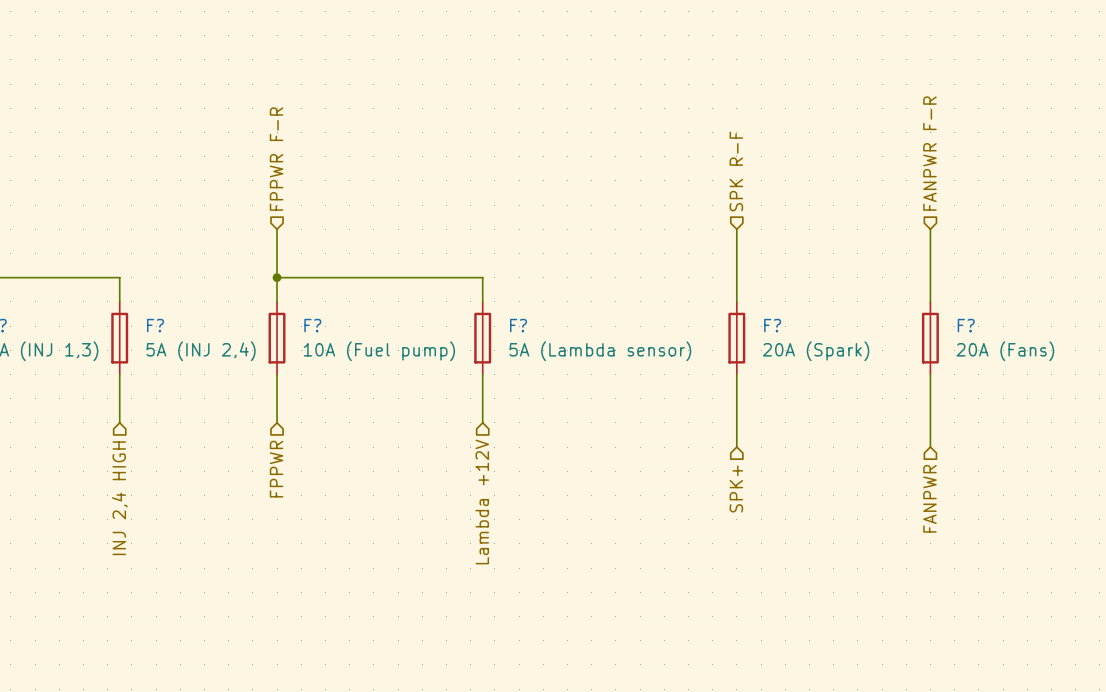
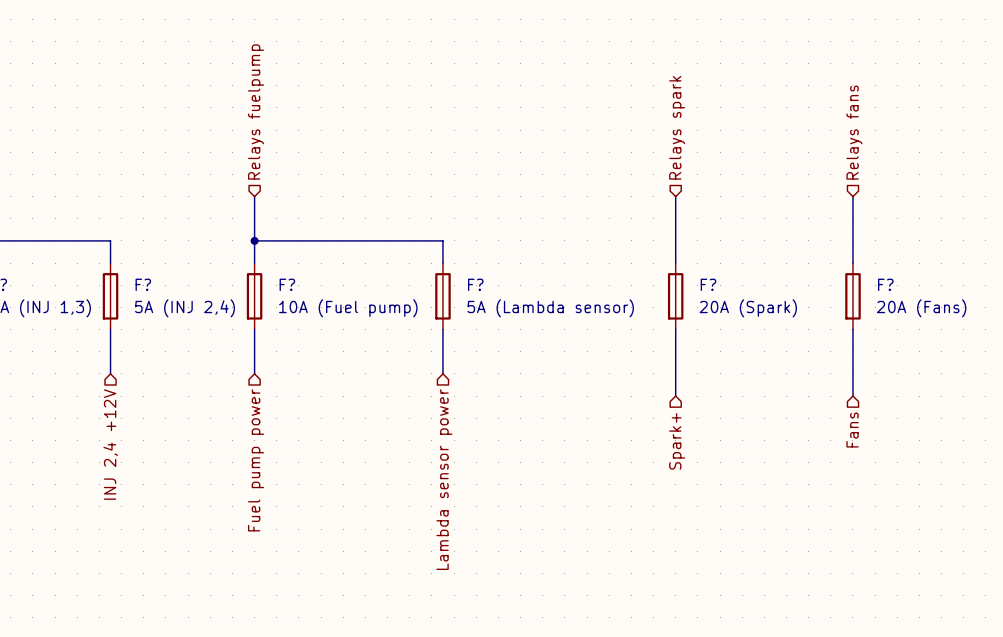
hierarchical label: FANPWR F-R (929, 153) -> Relays fans (854, 132)
hierarchical label: FPPWR F-R (276, 159) -> Relays fuelpump (256, 111)
hierarchical label: SPK R-F (736, 171) -> Relays spark (677, 127)
hierarchical label: FPPWR (276, 469) -> Fuel pump power (256, 460)
hierarchical label: SPK+ (736, 489) -> Spark+ (677, 441)
hierarchical label: INJ 2,4 HIGH (119, 498) -> INJ 2,4 +12V (110, 444)
hierarchical label: FANPWR (929, 498) -> Fans (852, 430)
hierarchical label: Lambda +12V (482, 501) -> Lambda sensor power (444, 479)

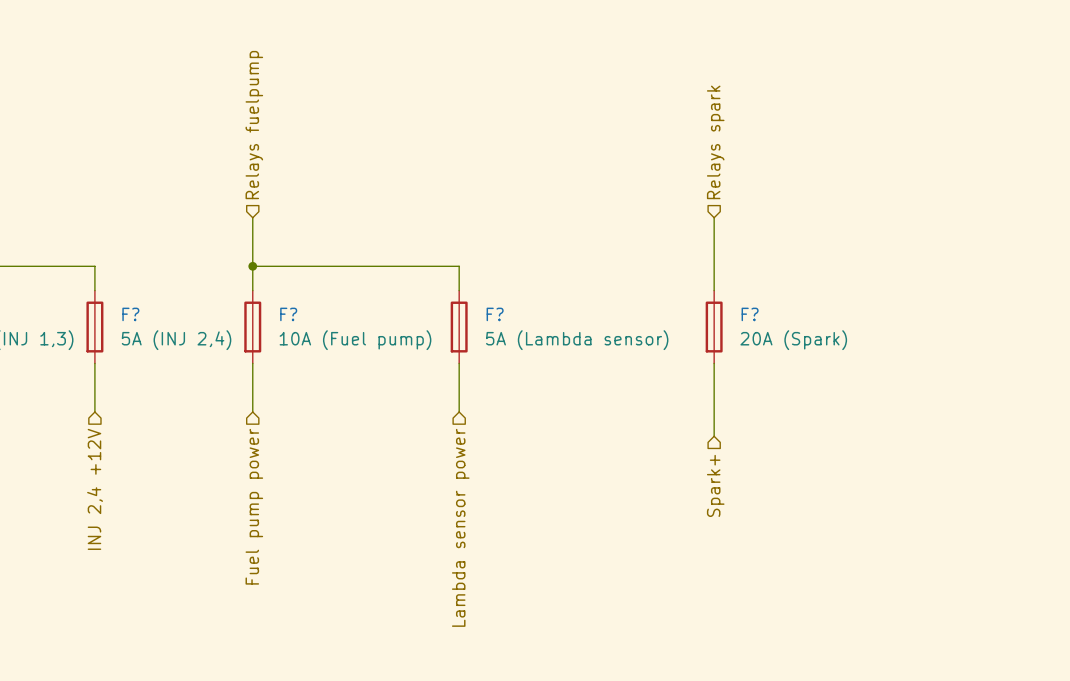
hierarchical label: Relays fans (854, 132) -> none
wire: (852, 196) (852, 263) -> none
F?: 20A (Fans) (852, 296) -> none
wire: (852, 329) (852, 396) -> none
hierarchical label: Fans (852, 430) -> none

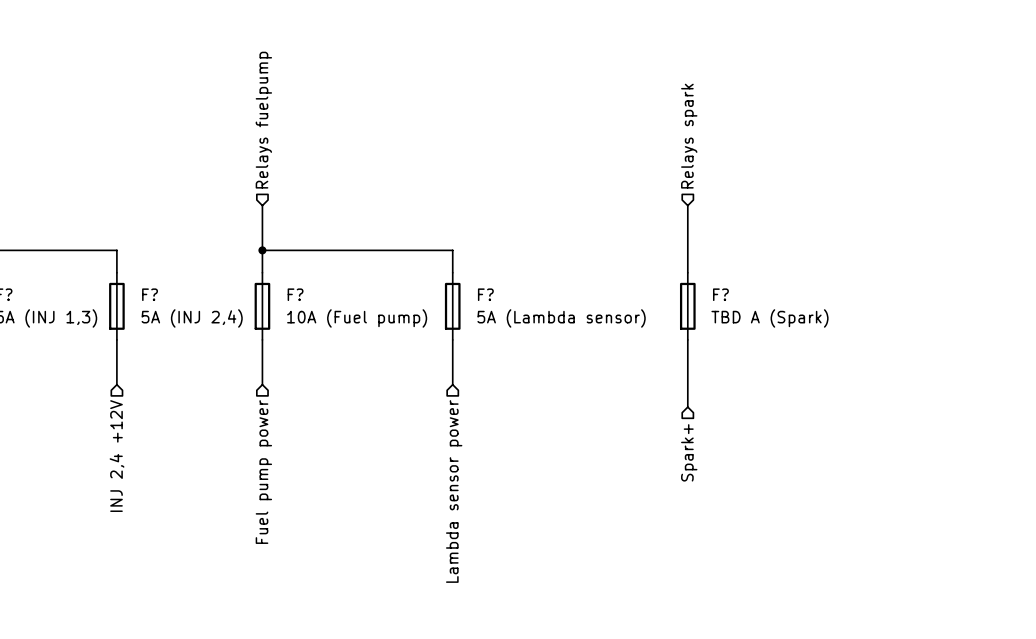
F? value: 20A (Spark) (793, 340) -> TBD A (Spark) (769, 318)

